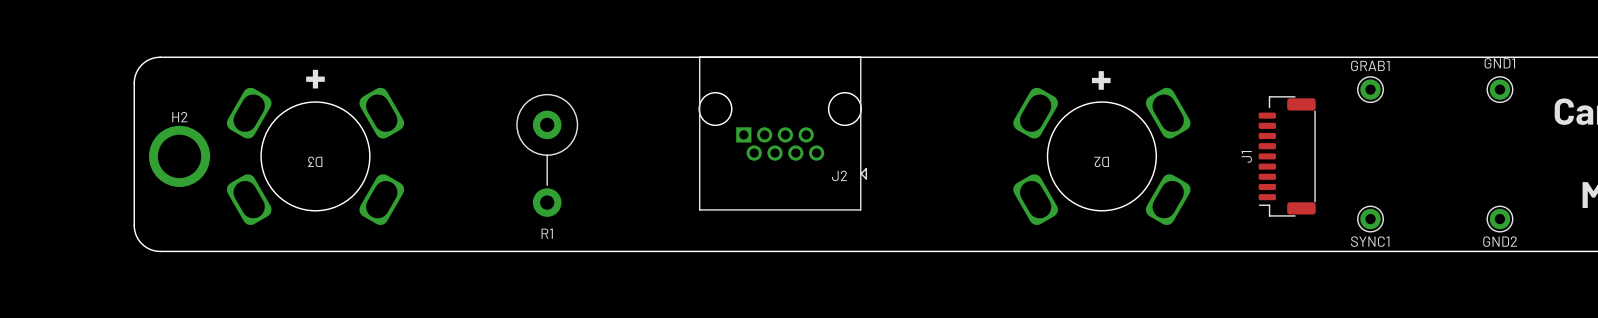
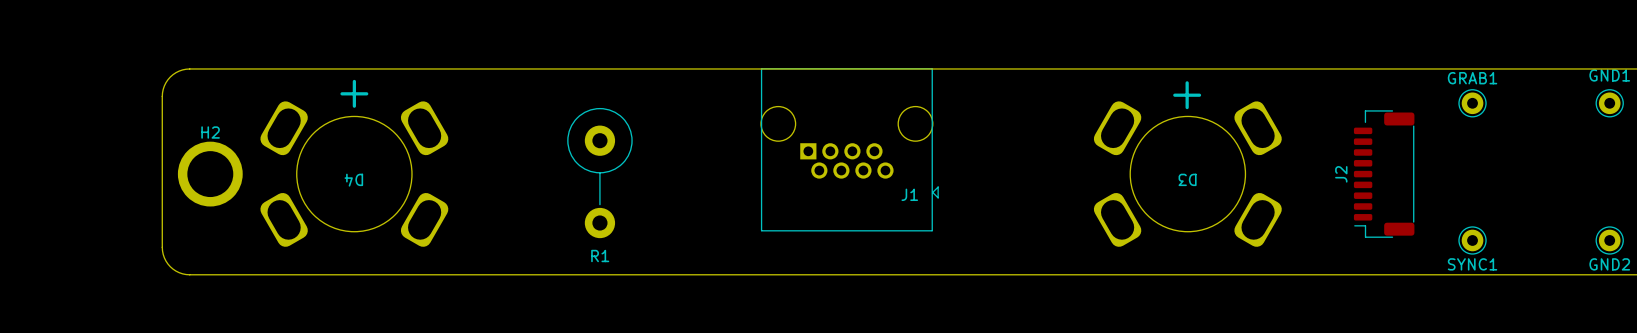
J1 name: J1 (1246, 156) -> J2 (1341, 174)
D3 name: D3 (315, 161) -> D4 (353, 180)
D2 name: D2 (1101, 161) -> D3 (1187, 179)
J2 name: J2 (839, 175) -> J1 (909, 194)

